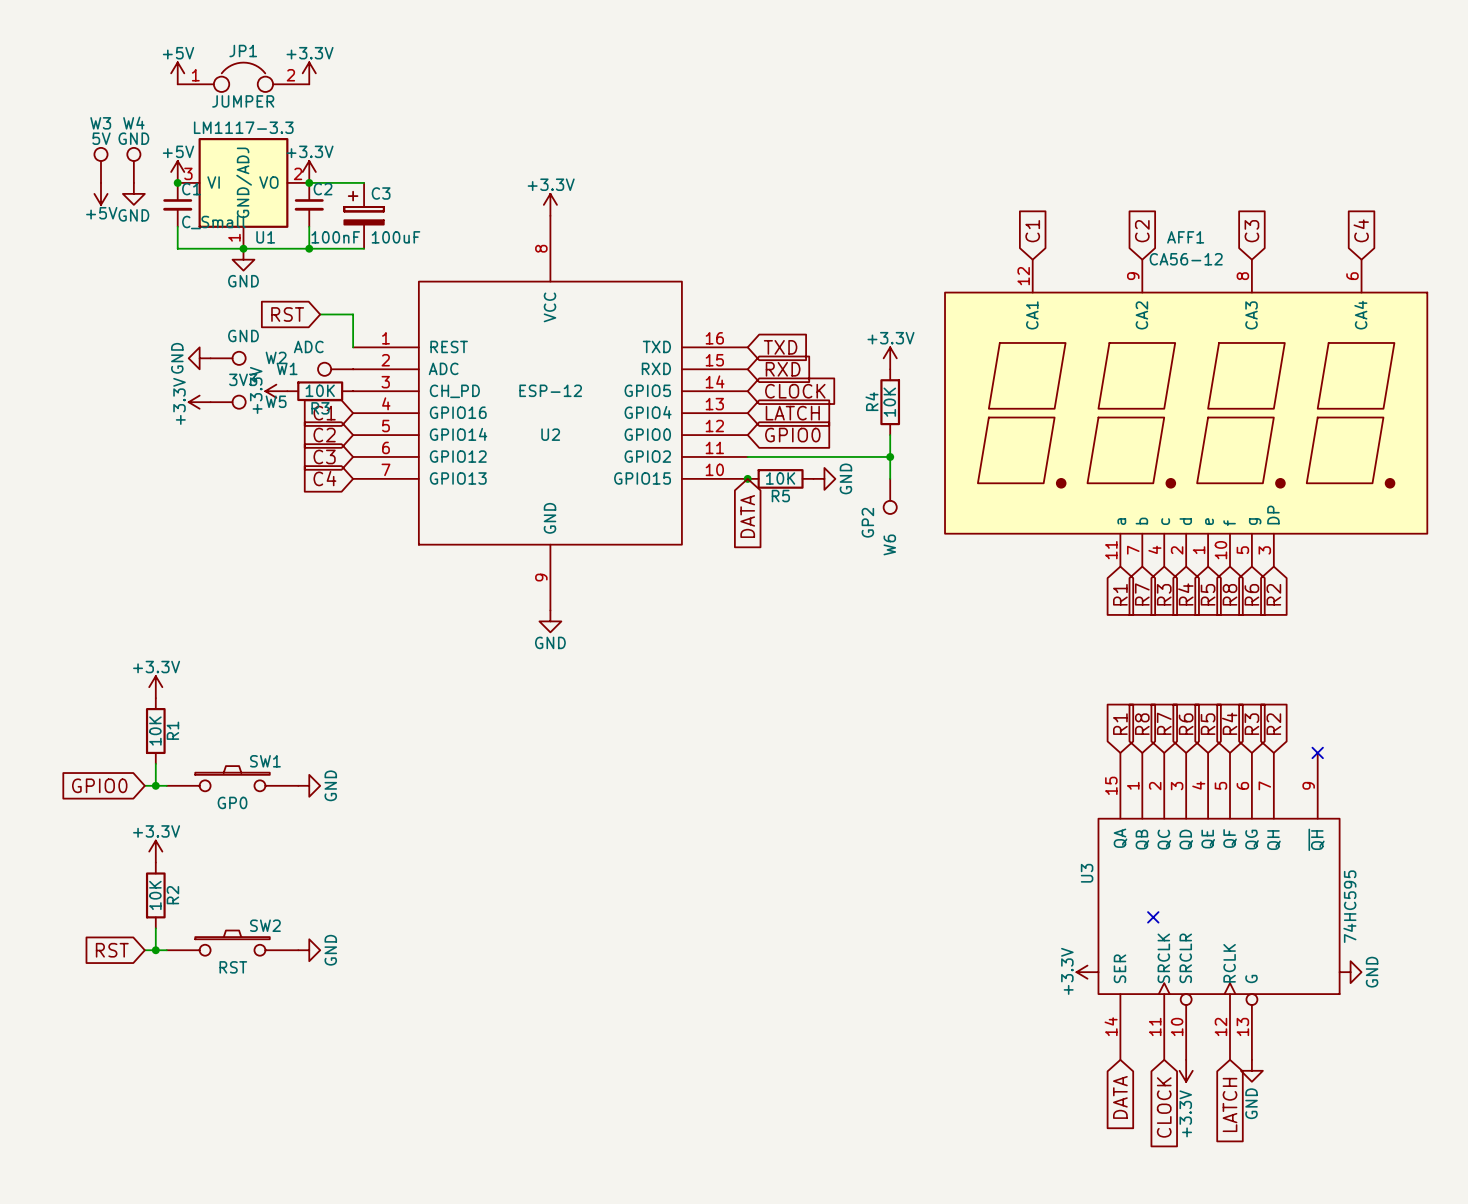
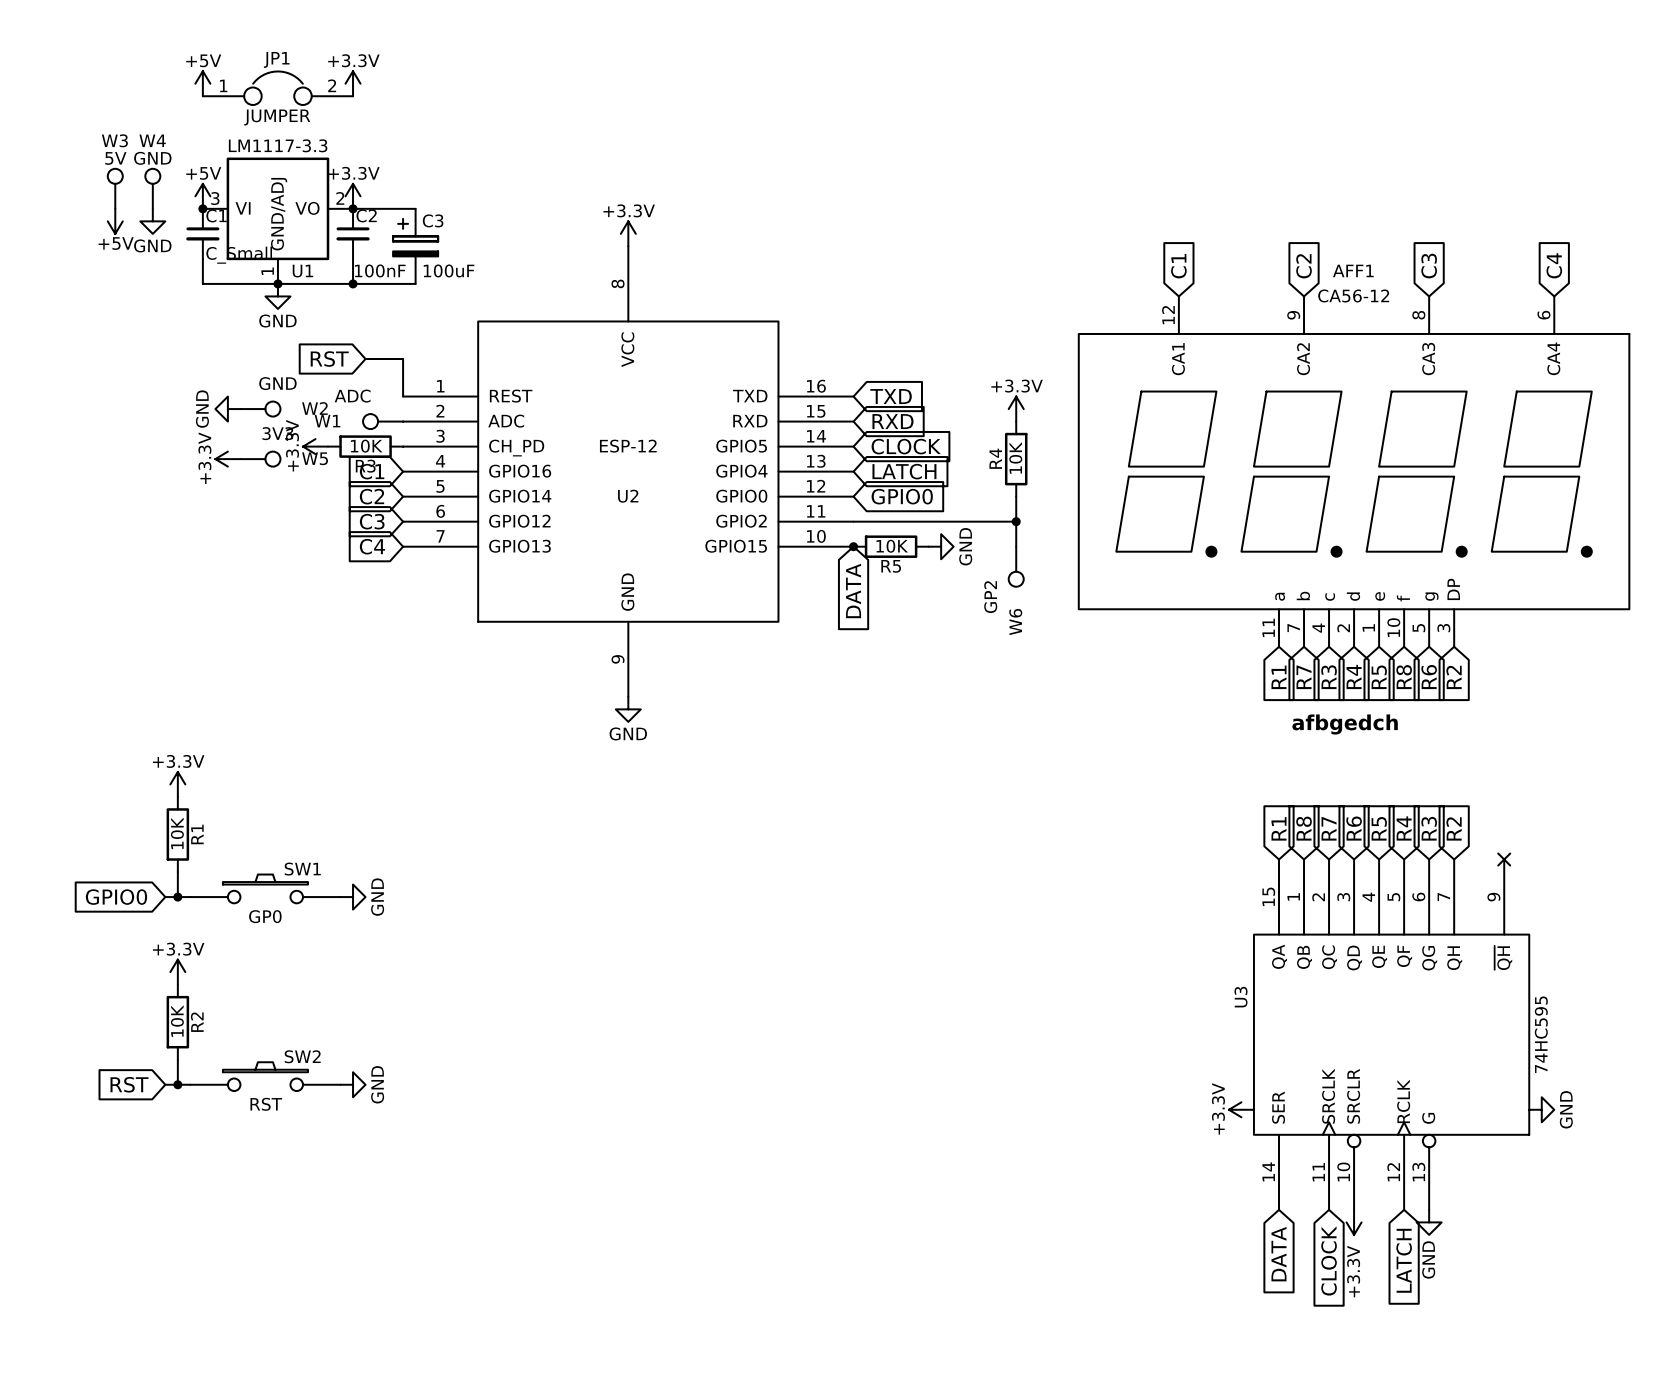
text: none -> afbgedch (1345, 724)
no-connect mark: (1153, 917) -> none

